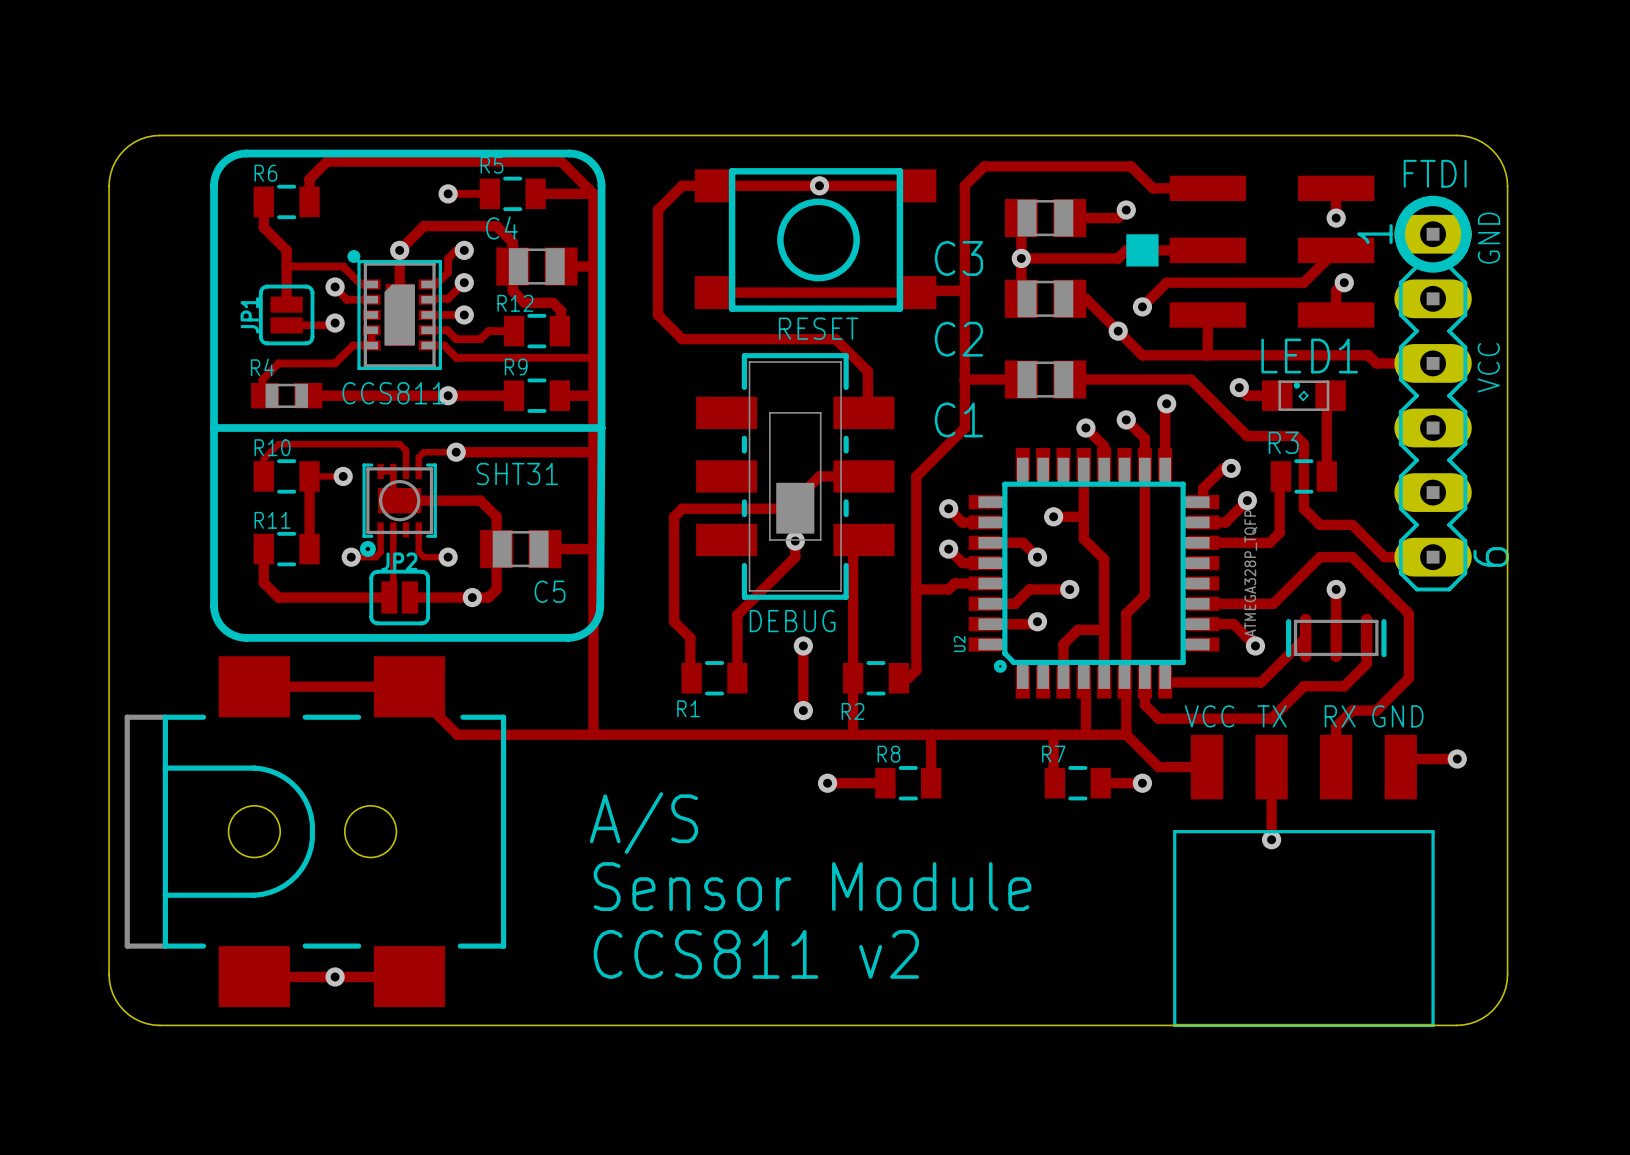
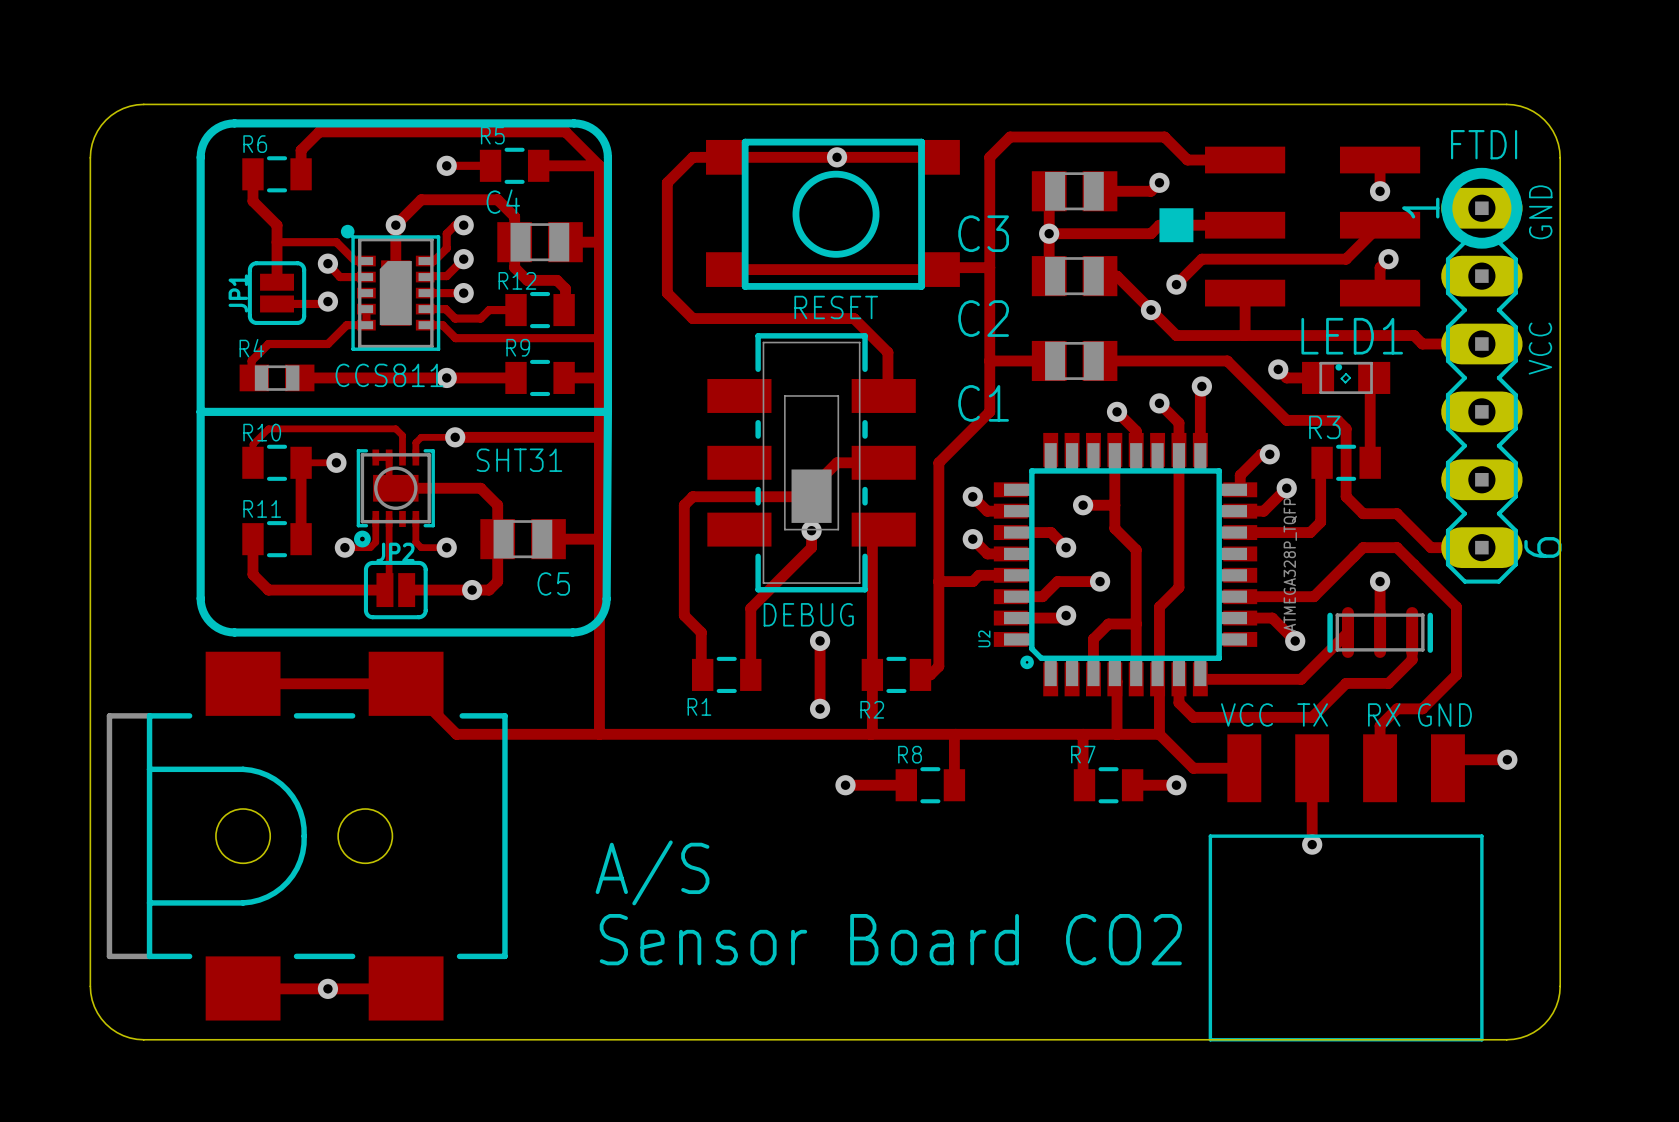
text position: A/S (643, 823) -> A/S (652, 872)
text: Sensor Module (812, 886) -> Sensor Board CO2 (890, 939)
text: CCS811 v2 (756, 954) -> none

